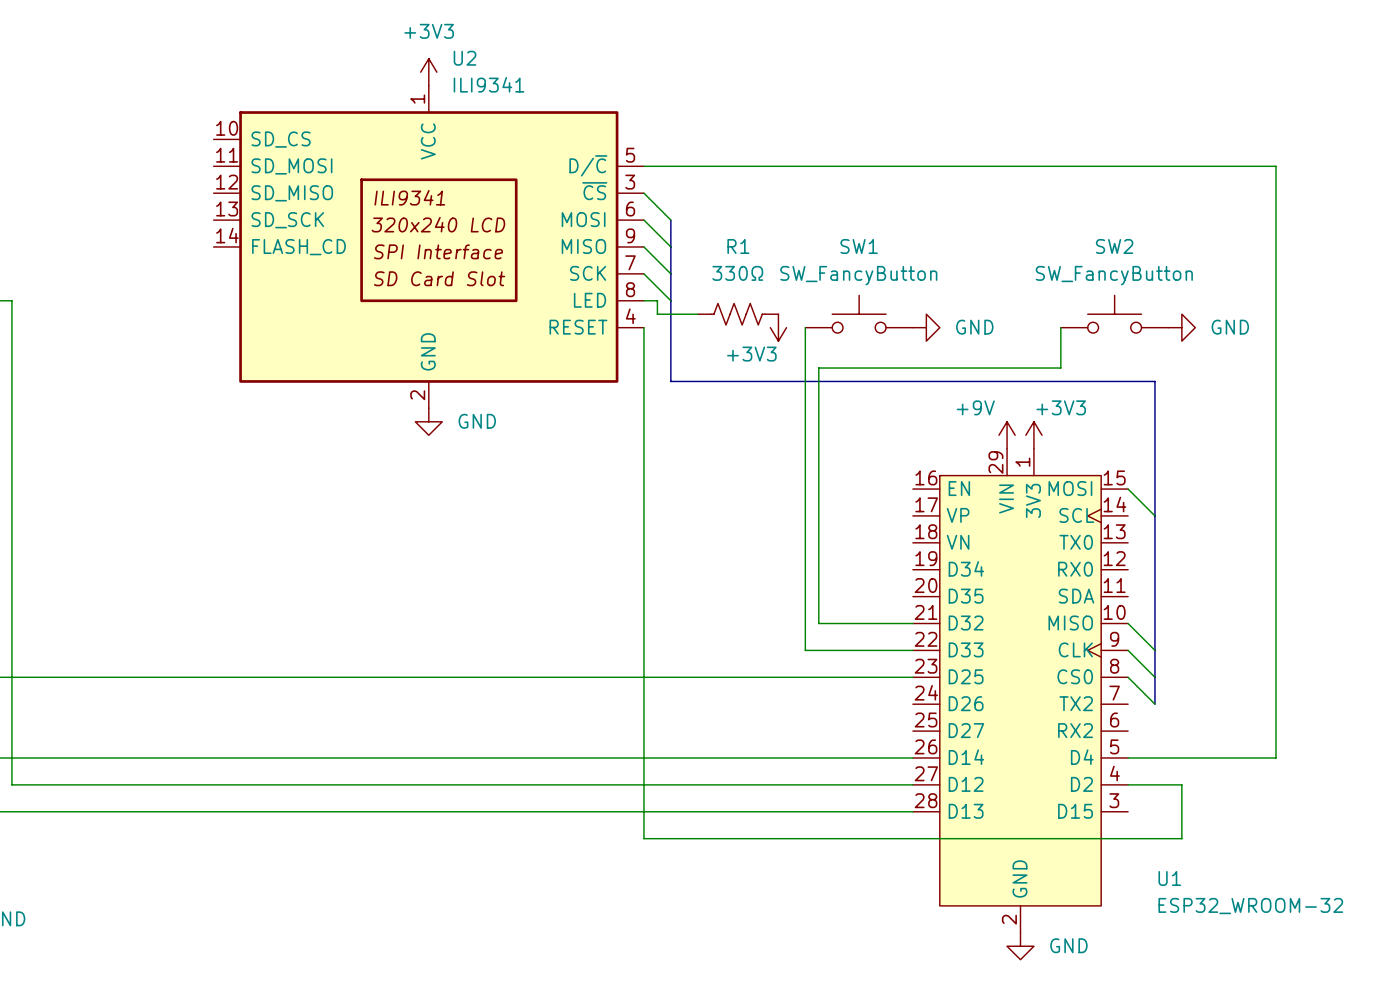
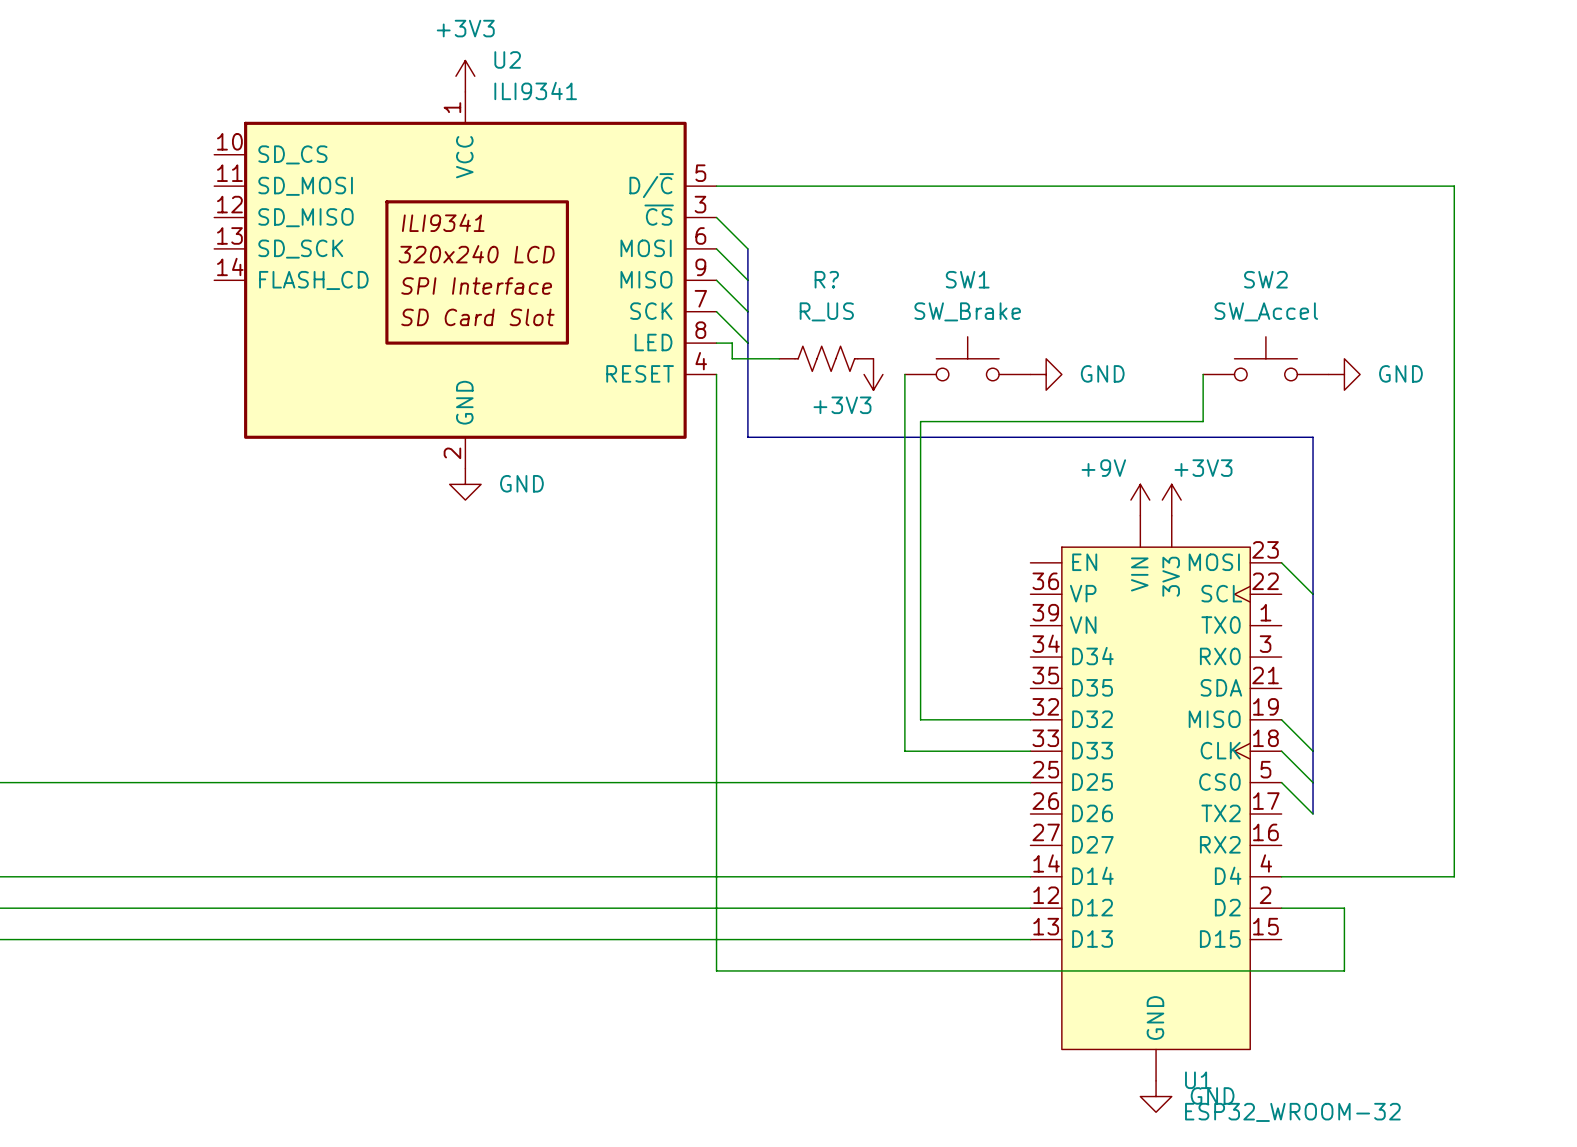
R1 name: R1 (738, 246) -> R? (826, 279)
R1 value: 330Ω (737, 273) -> R_US (826, 311)
SW1 value: SW_FancyButton (858, 275) -> SW_Brake (967, 311)
SW2 value: SW_FancyButton (1114, 275) -> SW_Accel (1266, 311)
U1 symbol: [912, 448, 1129, 933] -> [1030, 515, 1282, 1081]
U1 name position: U1 (1169, 878) -> U1 (1198, 1080)
U1 value position: ESP32_WROOM-32 (1250, 906) -> ESP32_WROOM-32 (1292, 1112)

